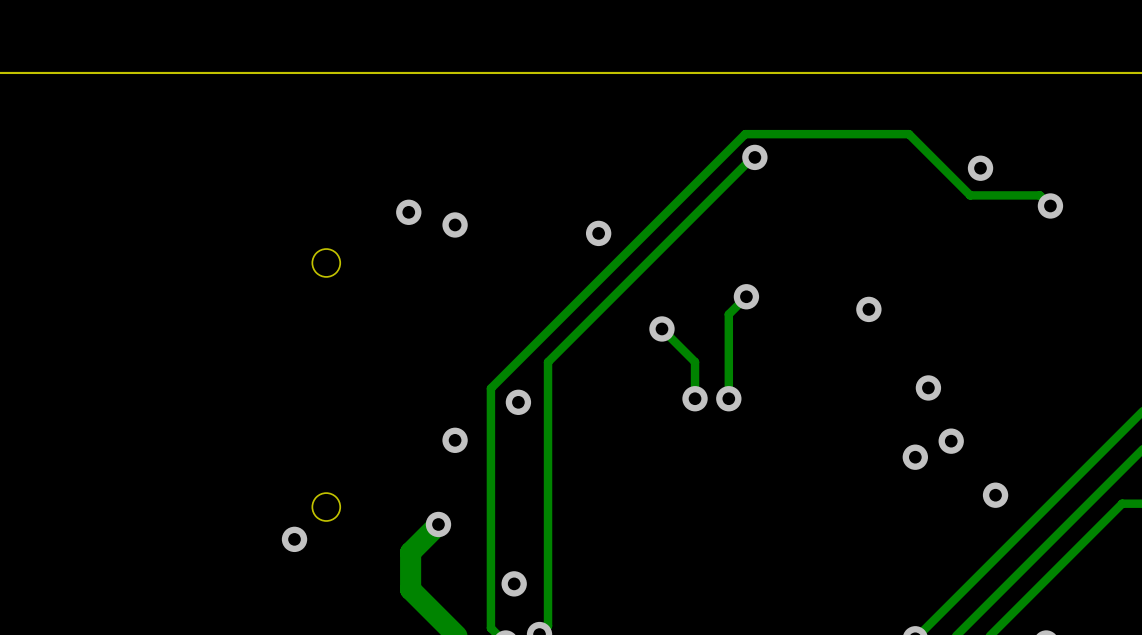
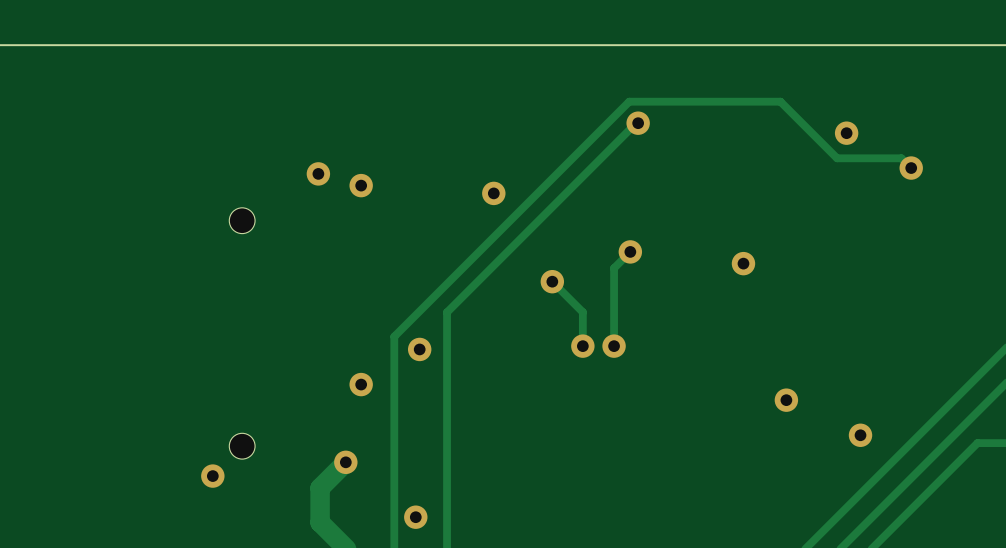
via: (928, 387) -> none
via: (951, 441) -> none

